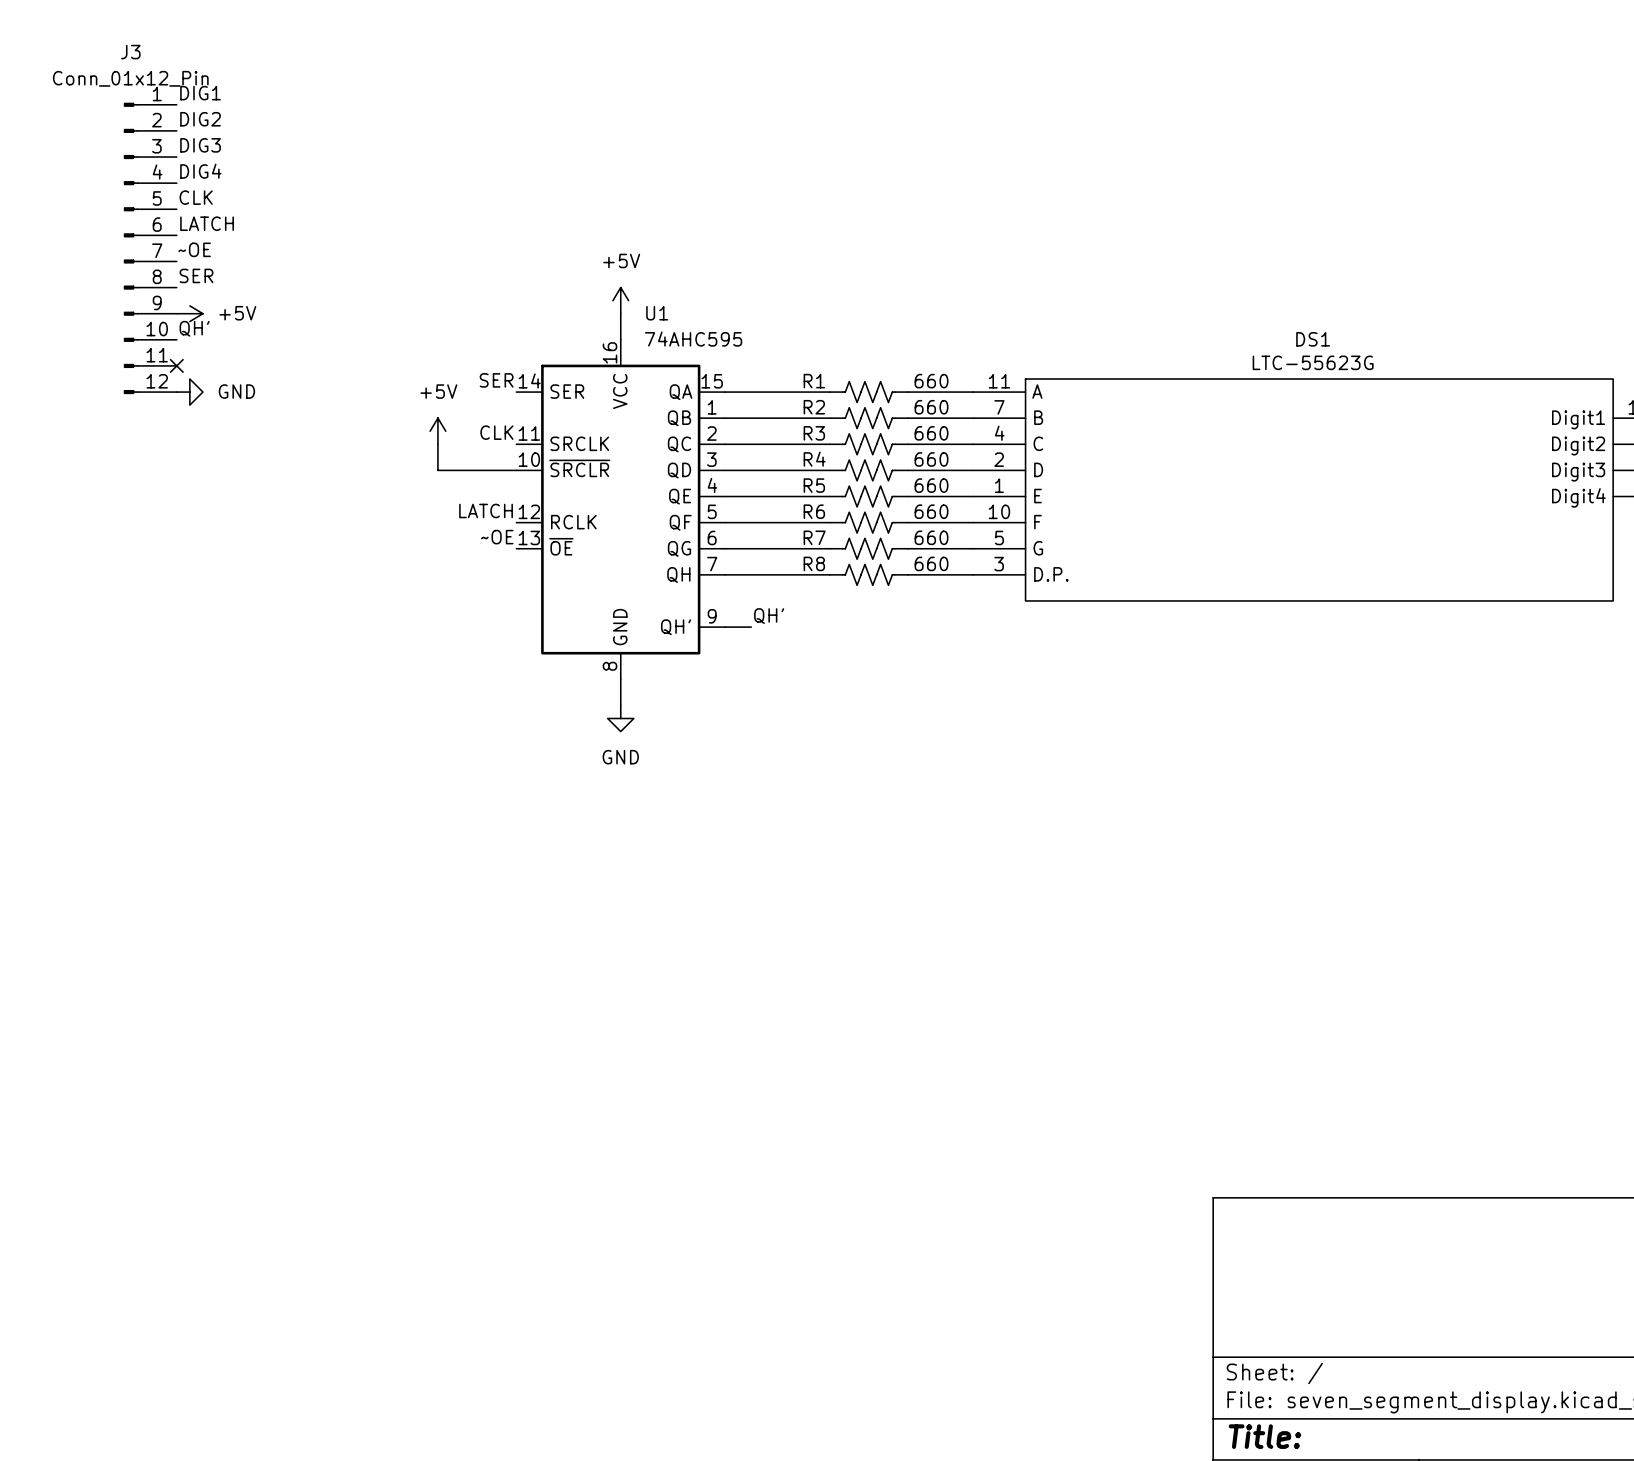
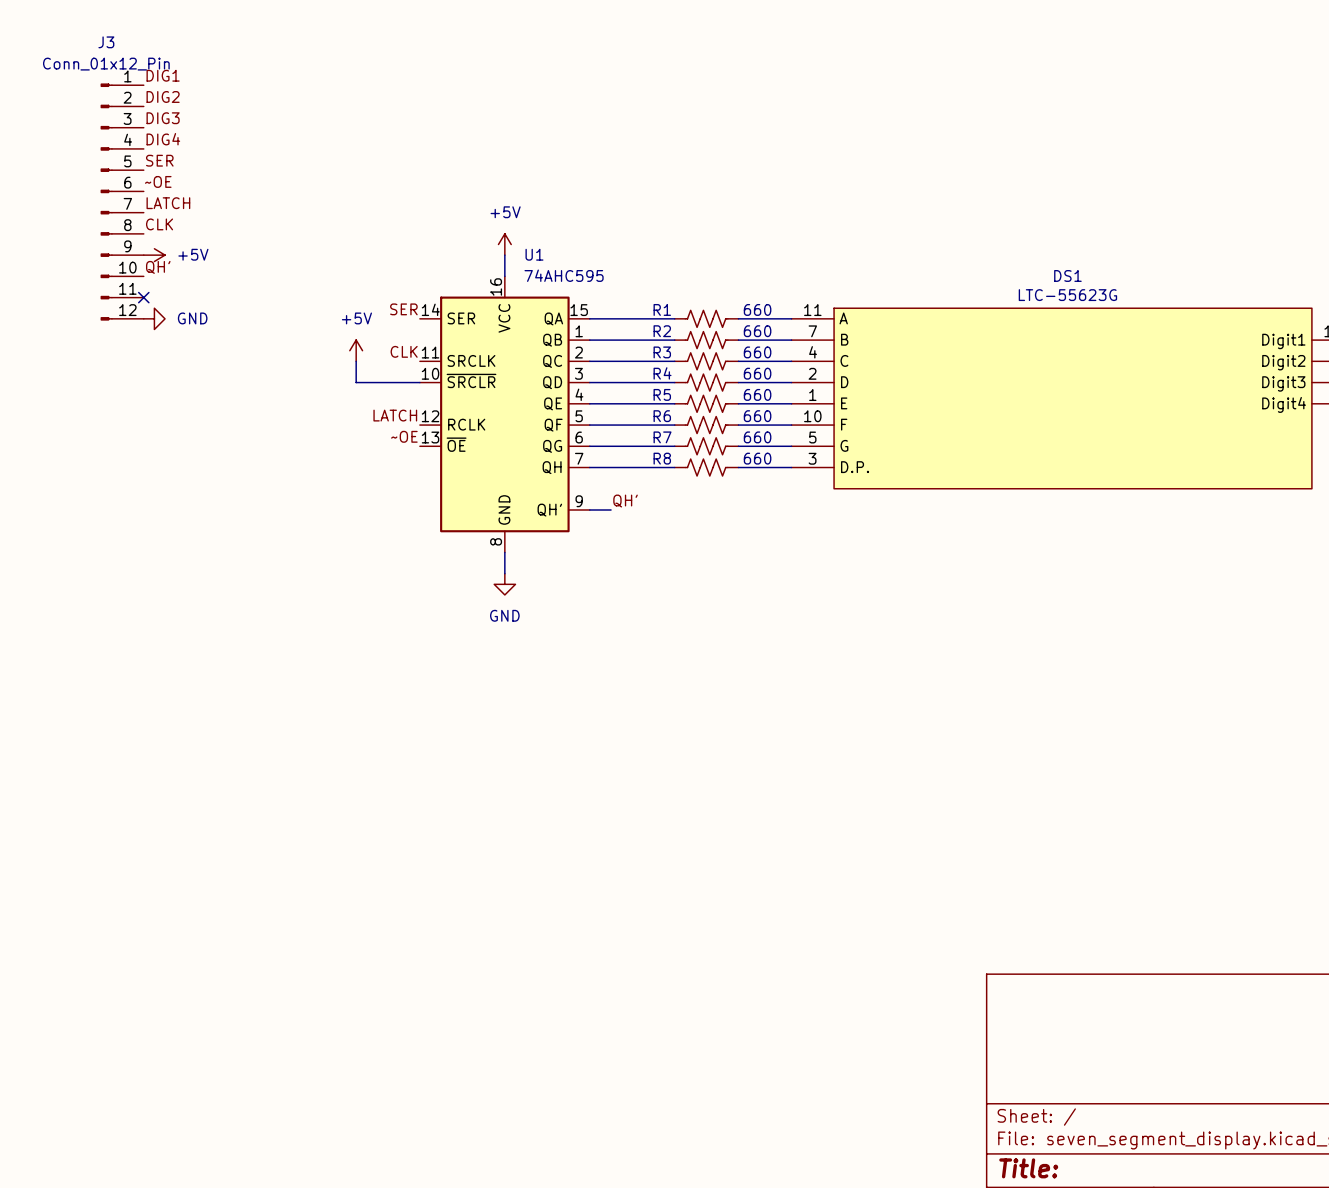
label: CLK (196, 197) -> SER (159, 160)
label: LATCH (207, 223) -> ~OE (158, 181)
label: ~OE (194, 249) -> LATCH (168, 203)
label: SER (196, 275) -> CLK (159, 224)

